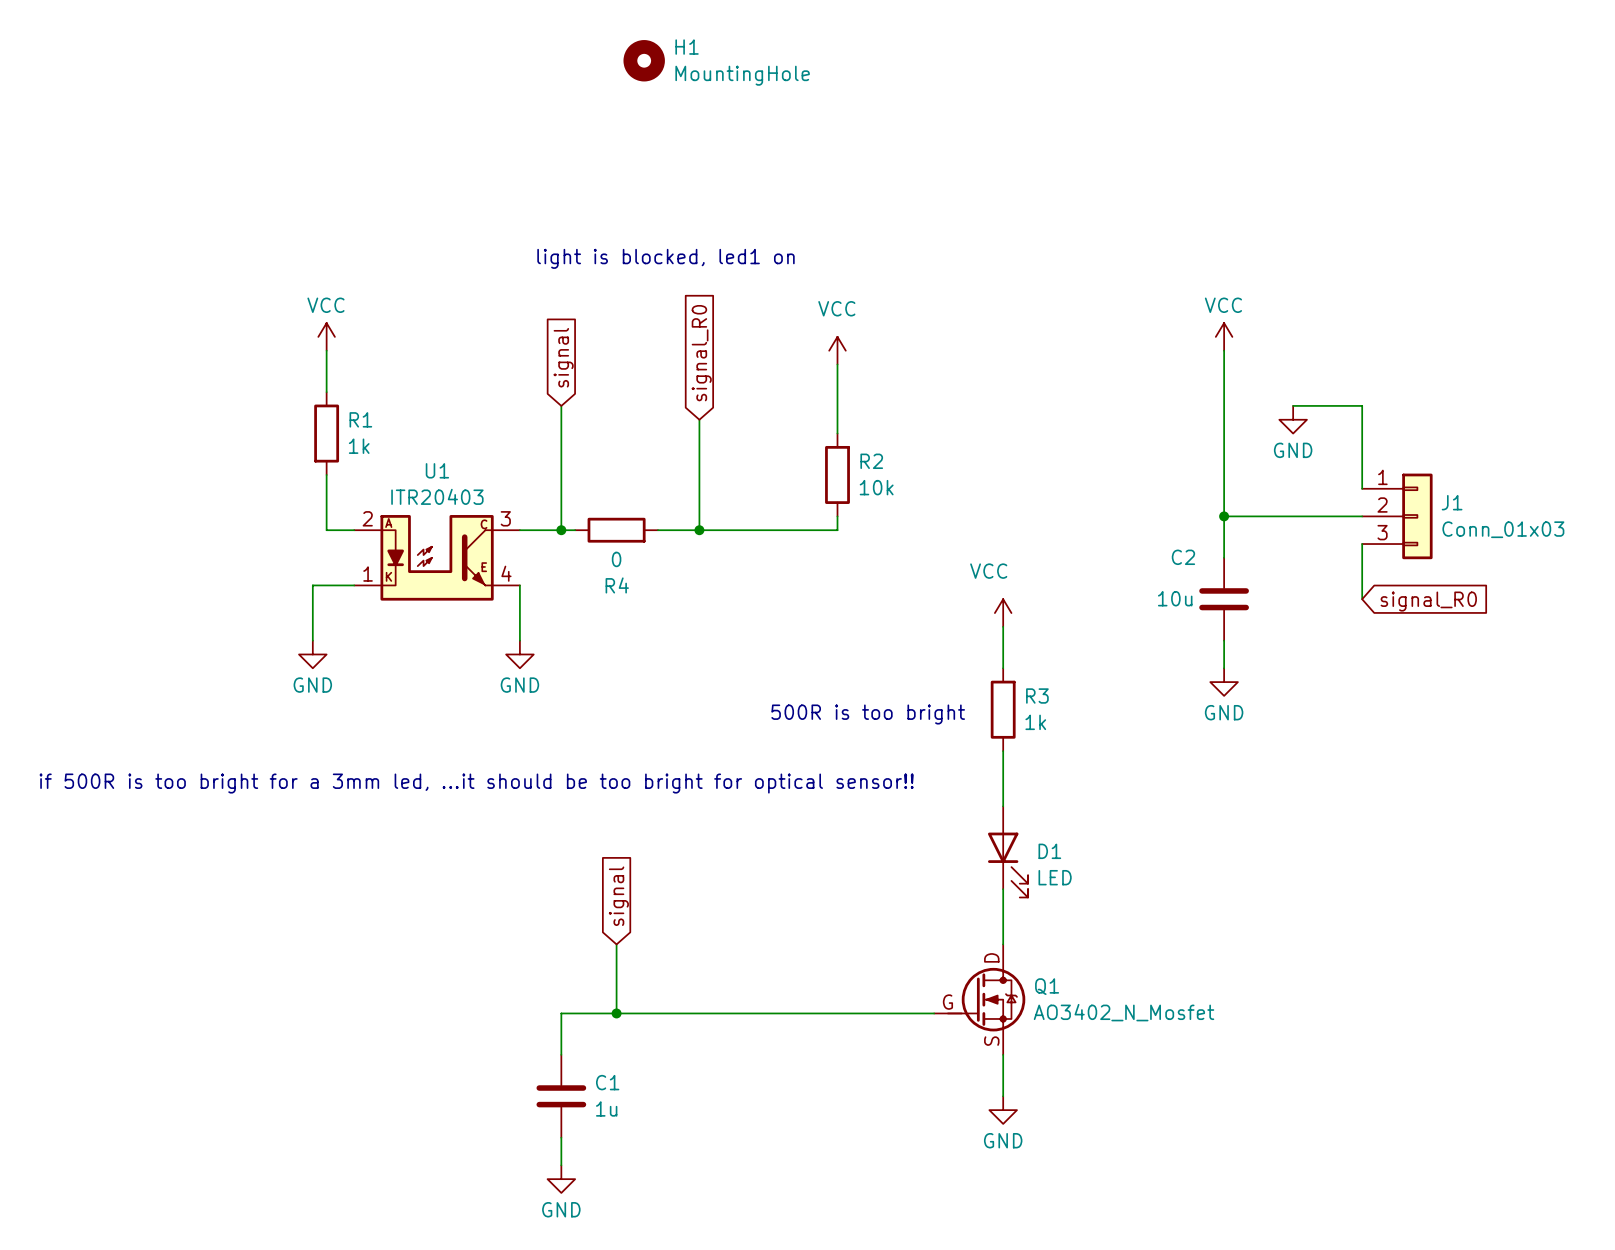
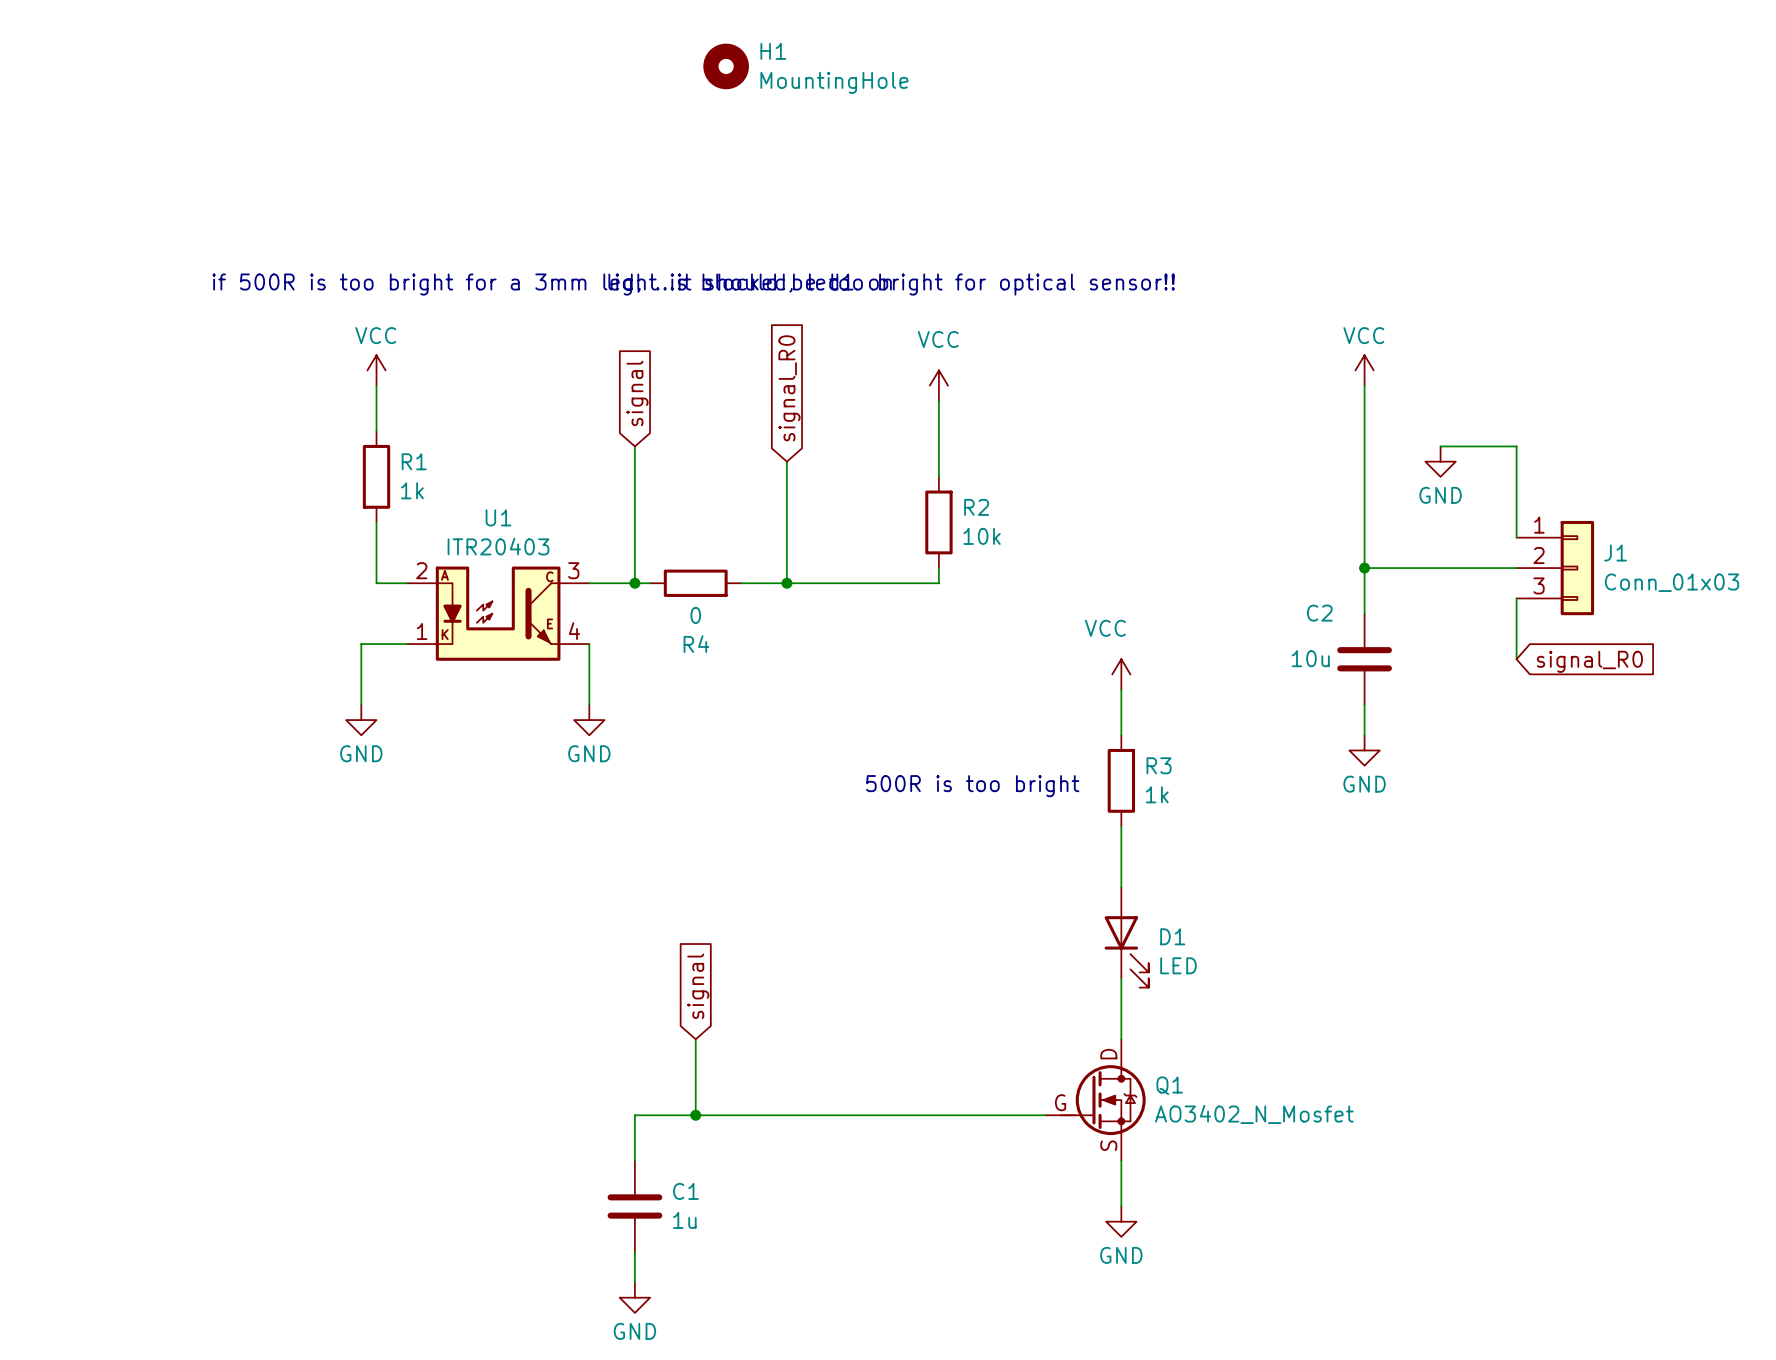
text: none -> if 500R is too bright for a 3mm led, ...it should be too bright for optical sensor!! (693, 284)
text: if 500R is too bright for a 3mm led, ...it should be too bright for optical sensor!! (476, 783) -> none

